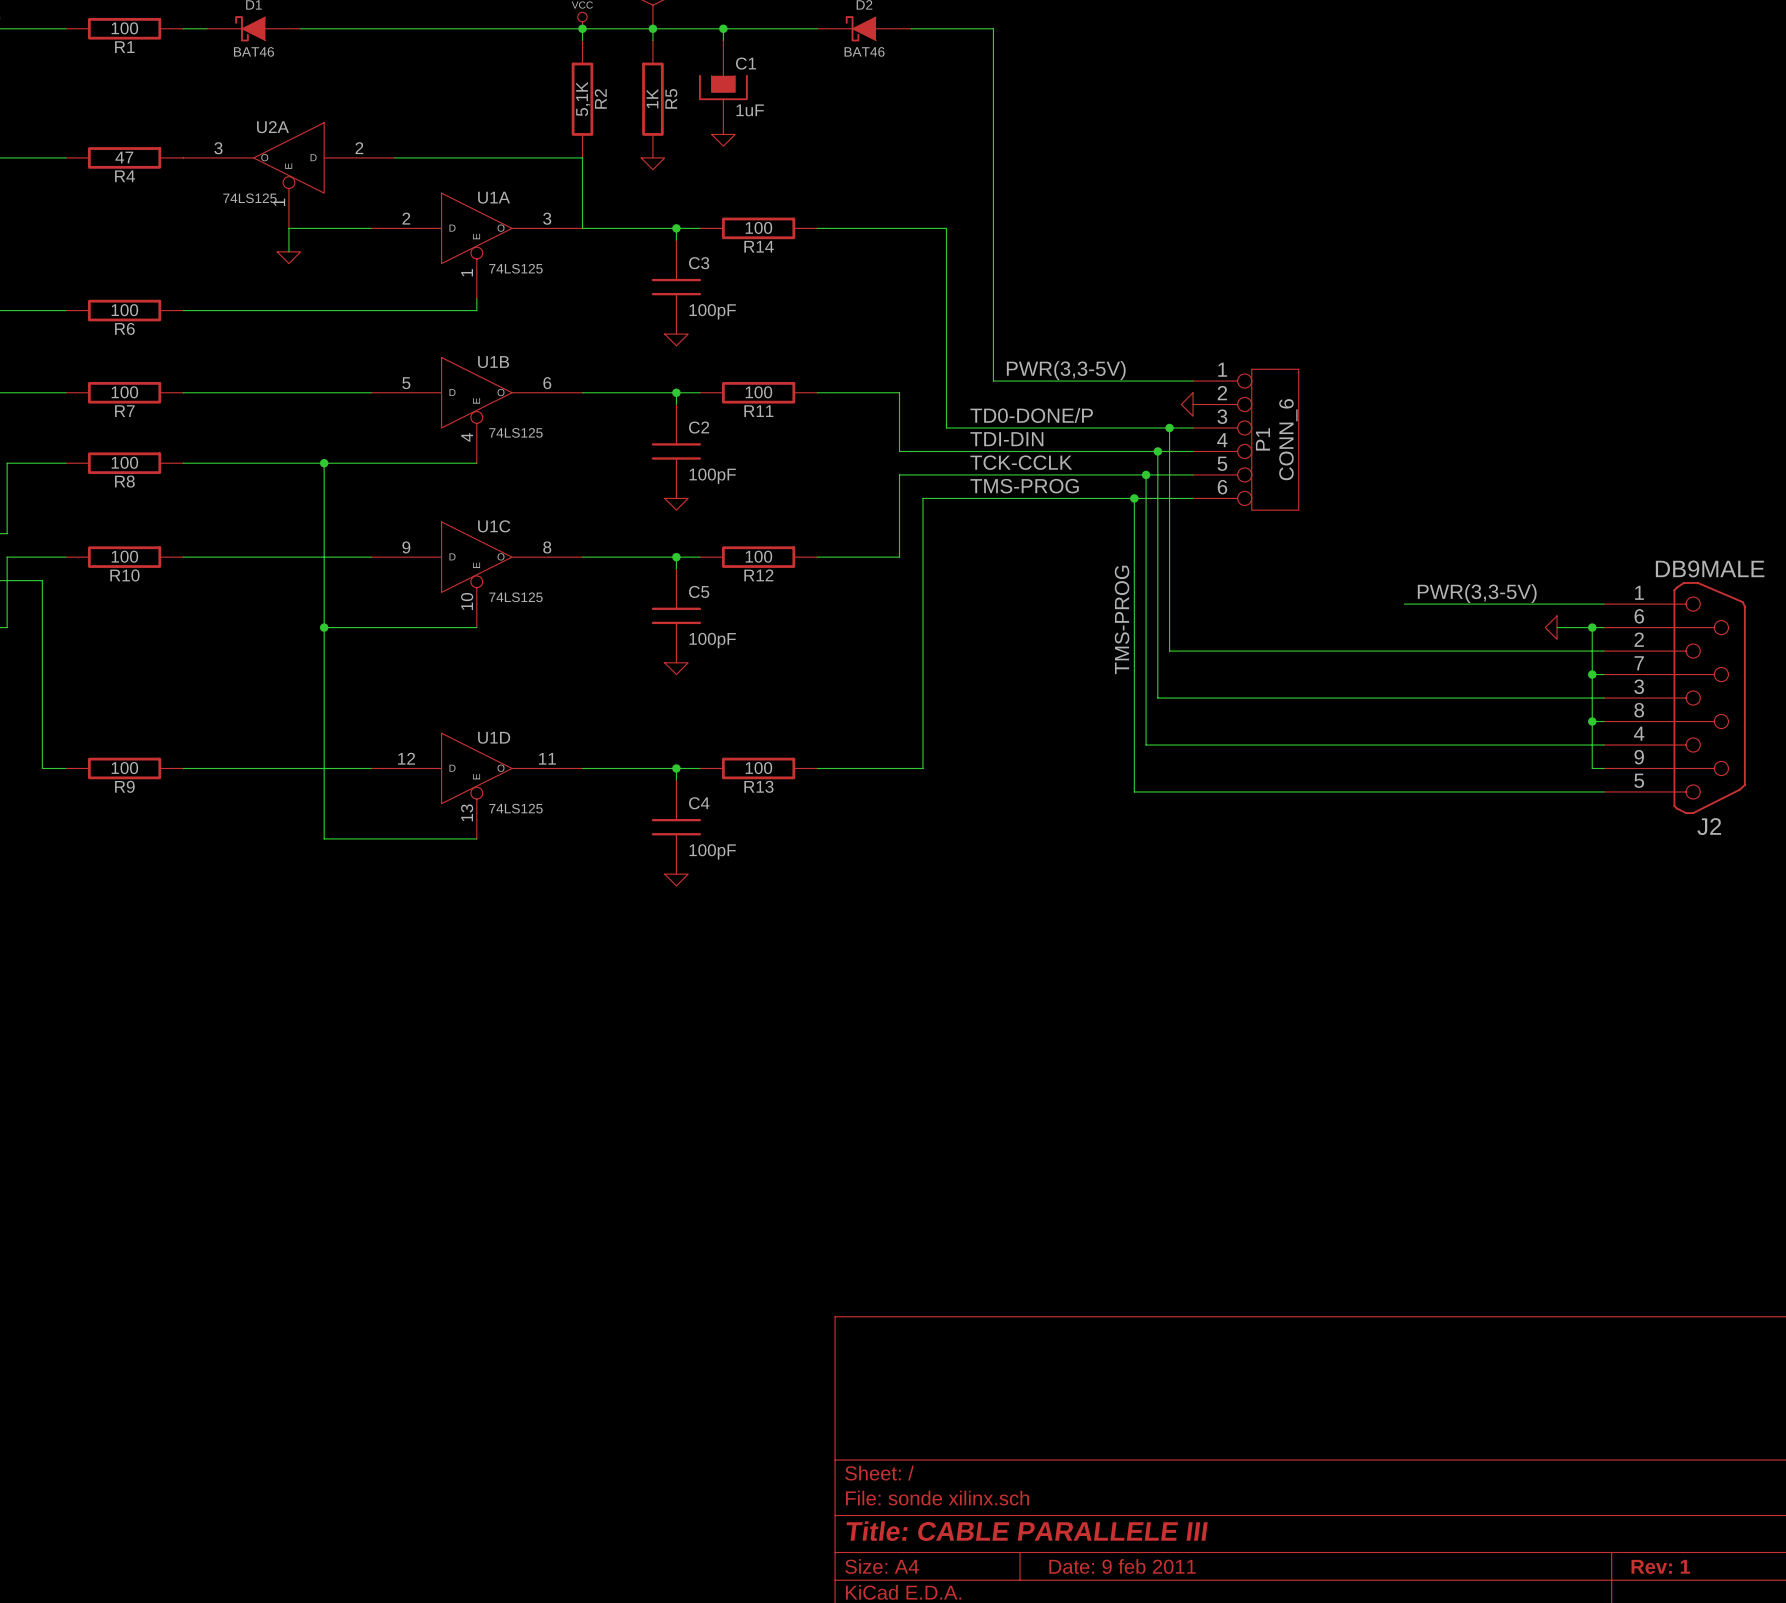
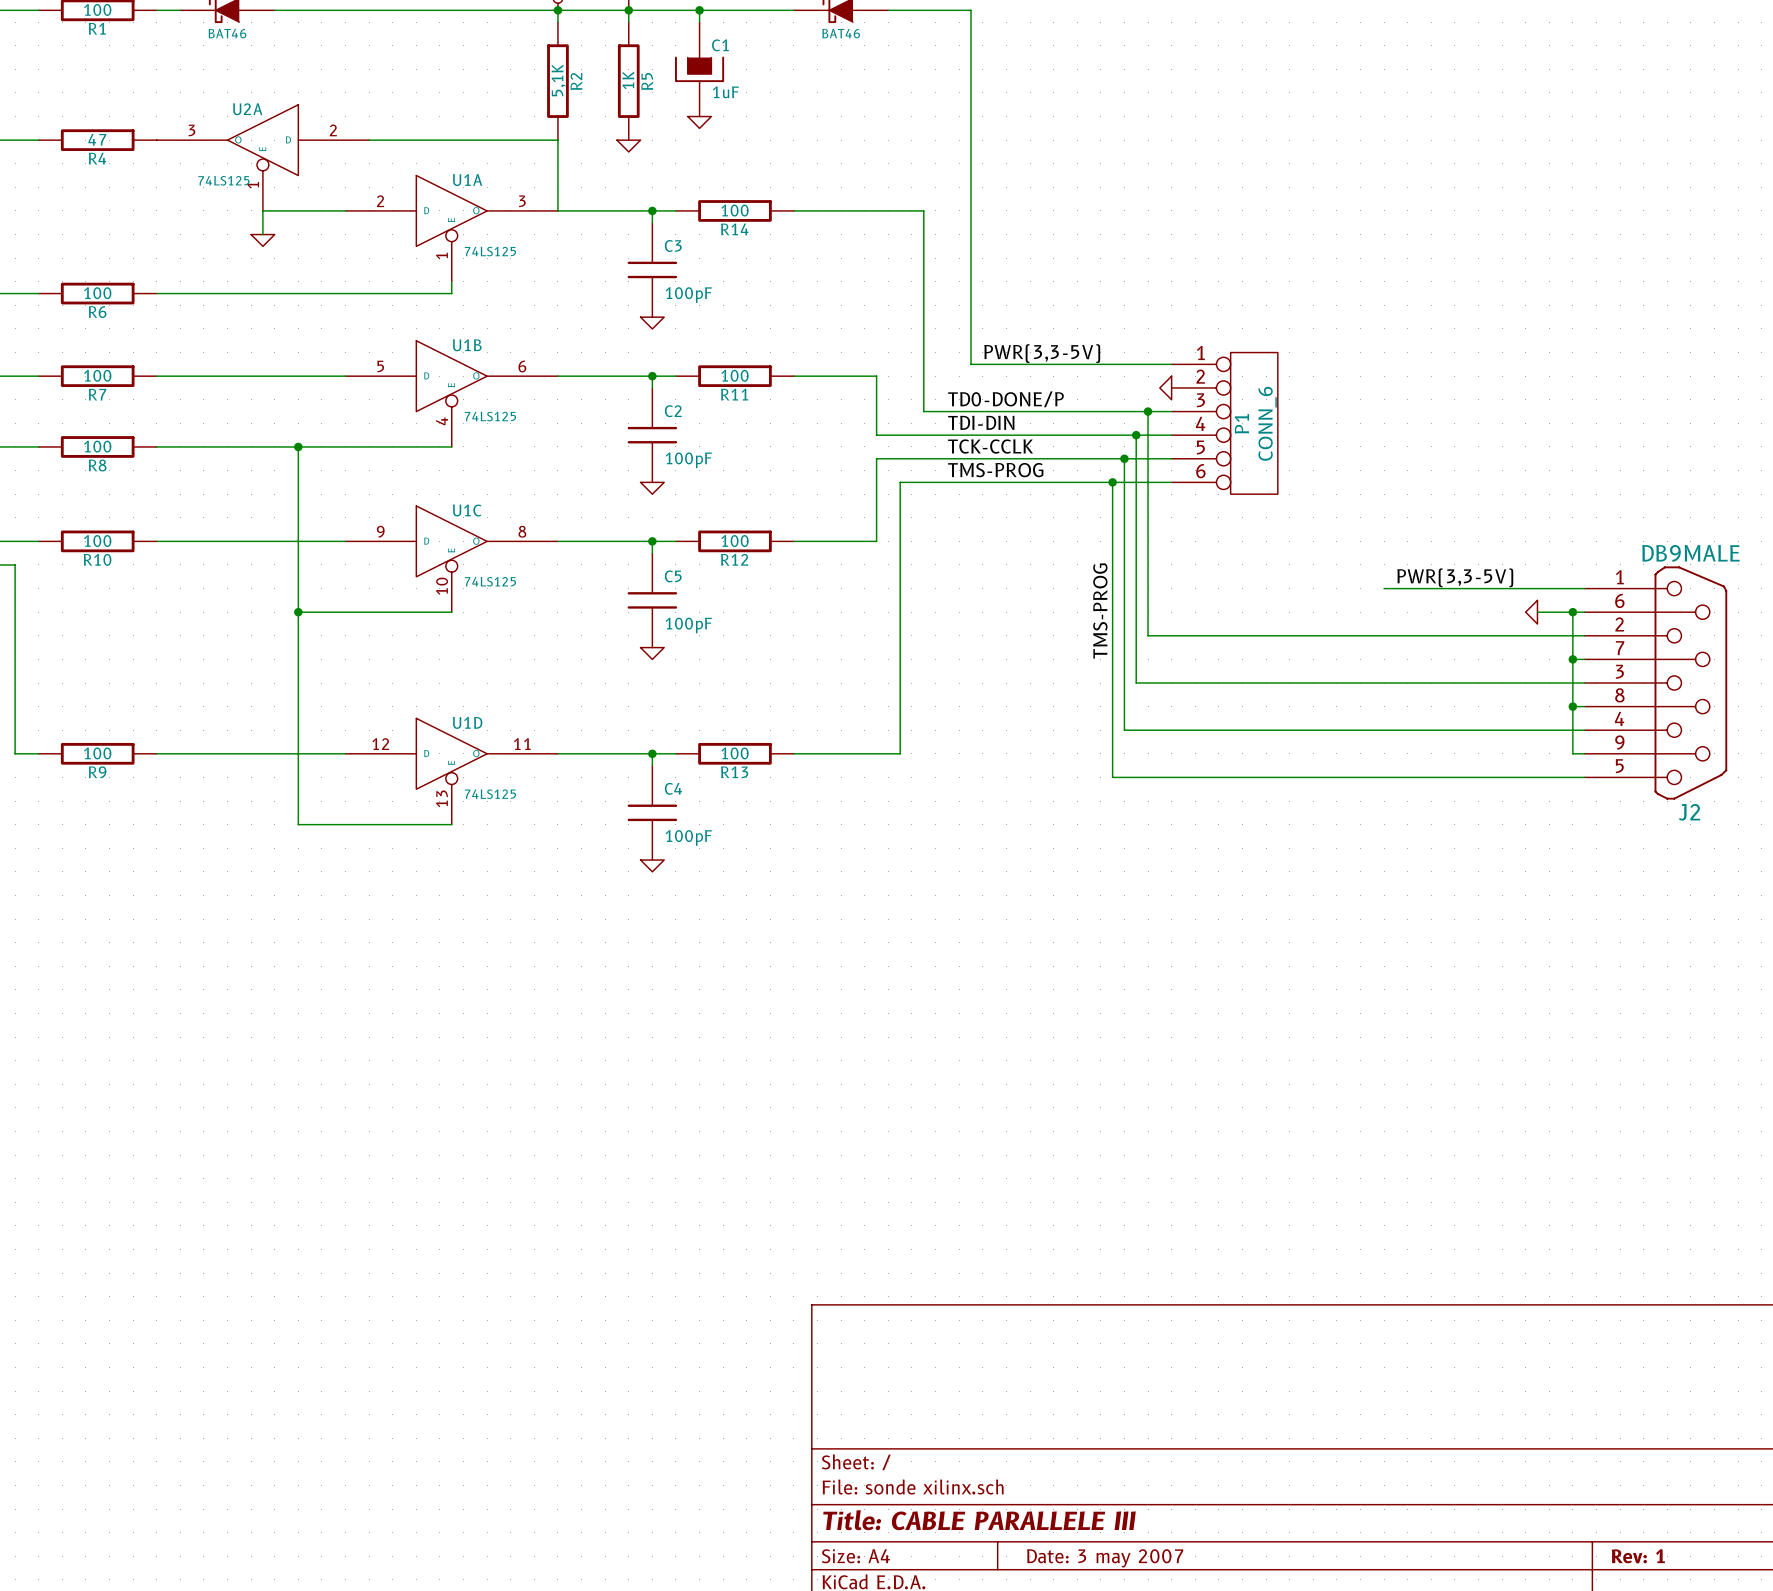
title block: Date: 9 feb 2011 (1122, 1566) -> Date: 3 may 2007 (1105, 1558)

